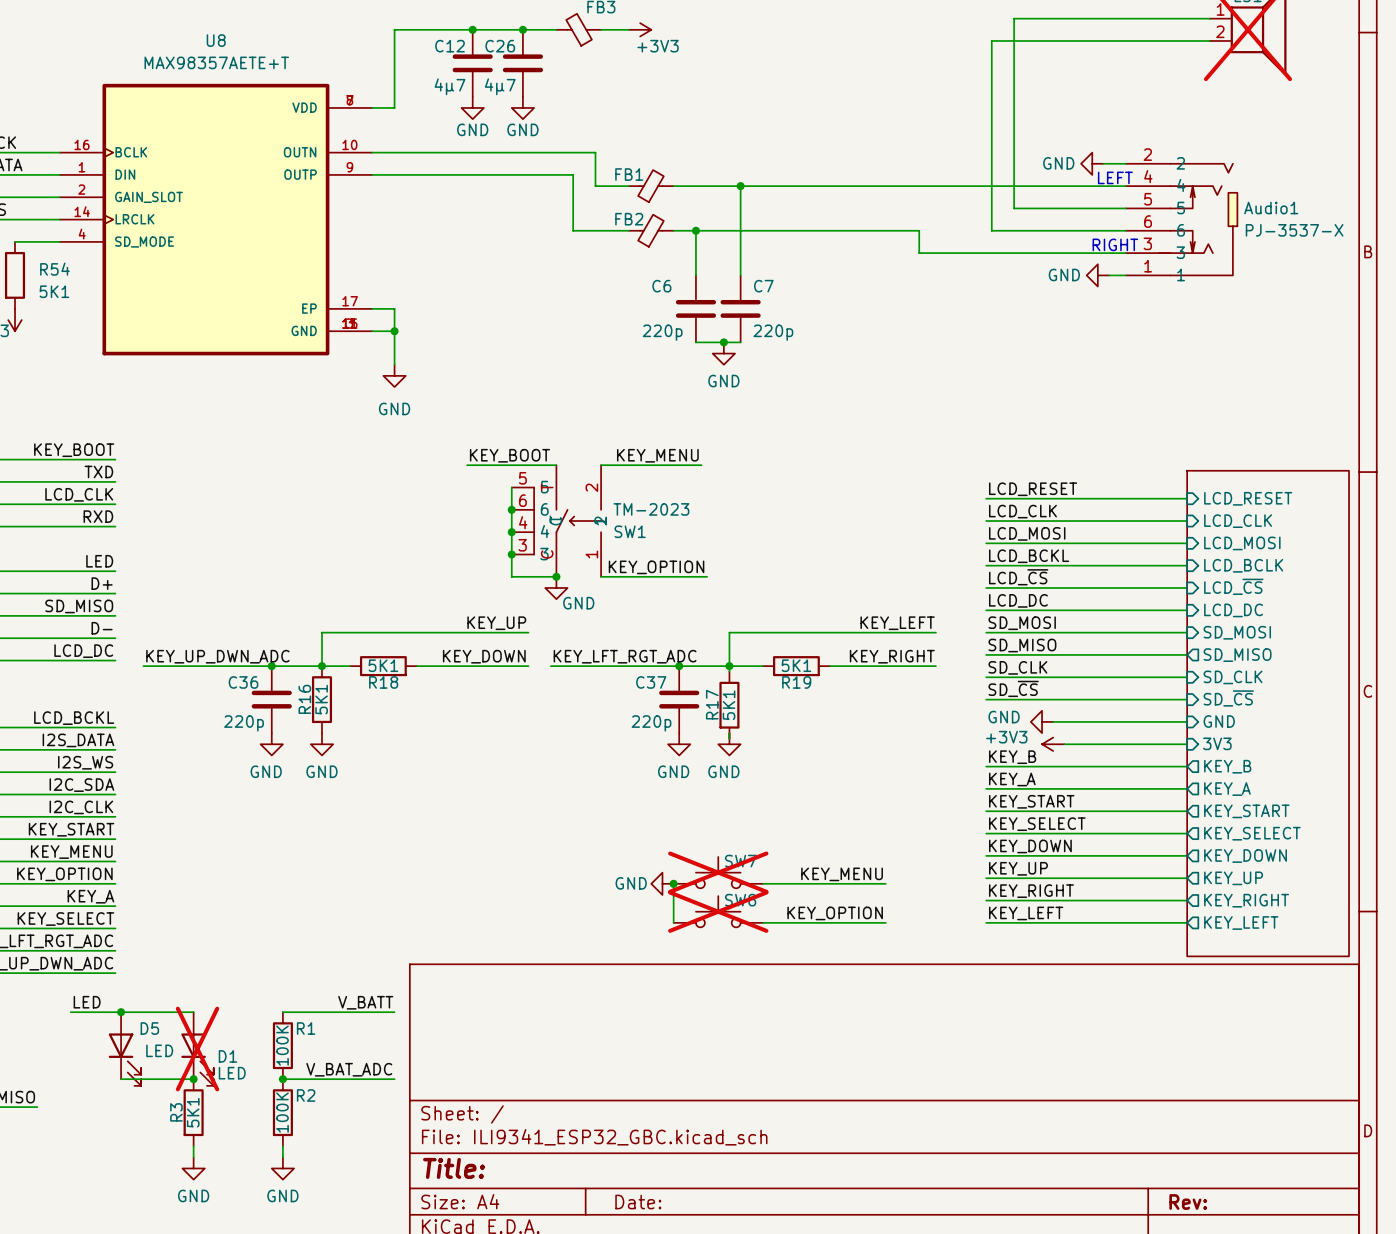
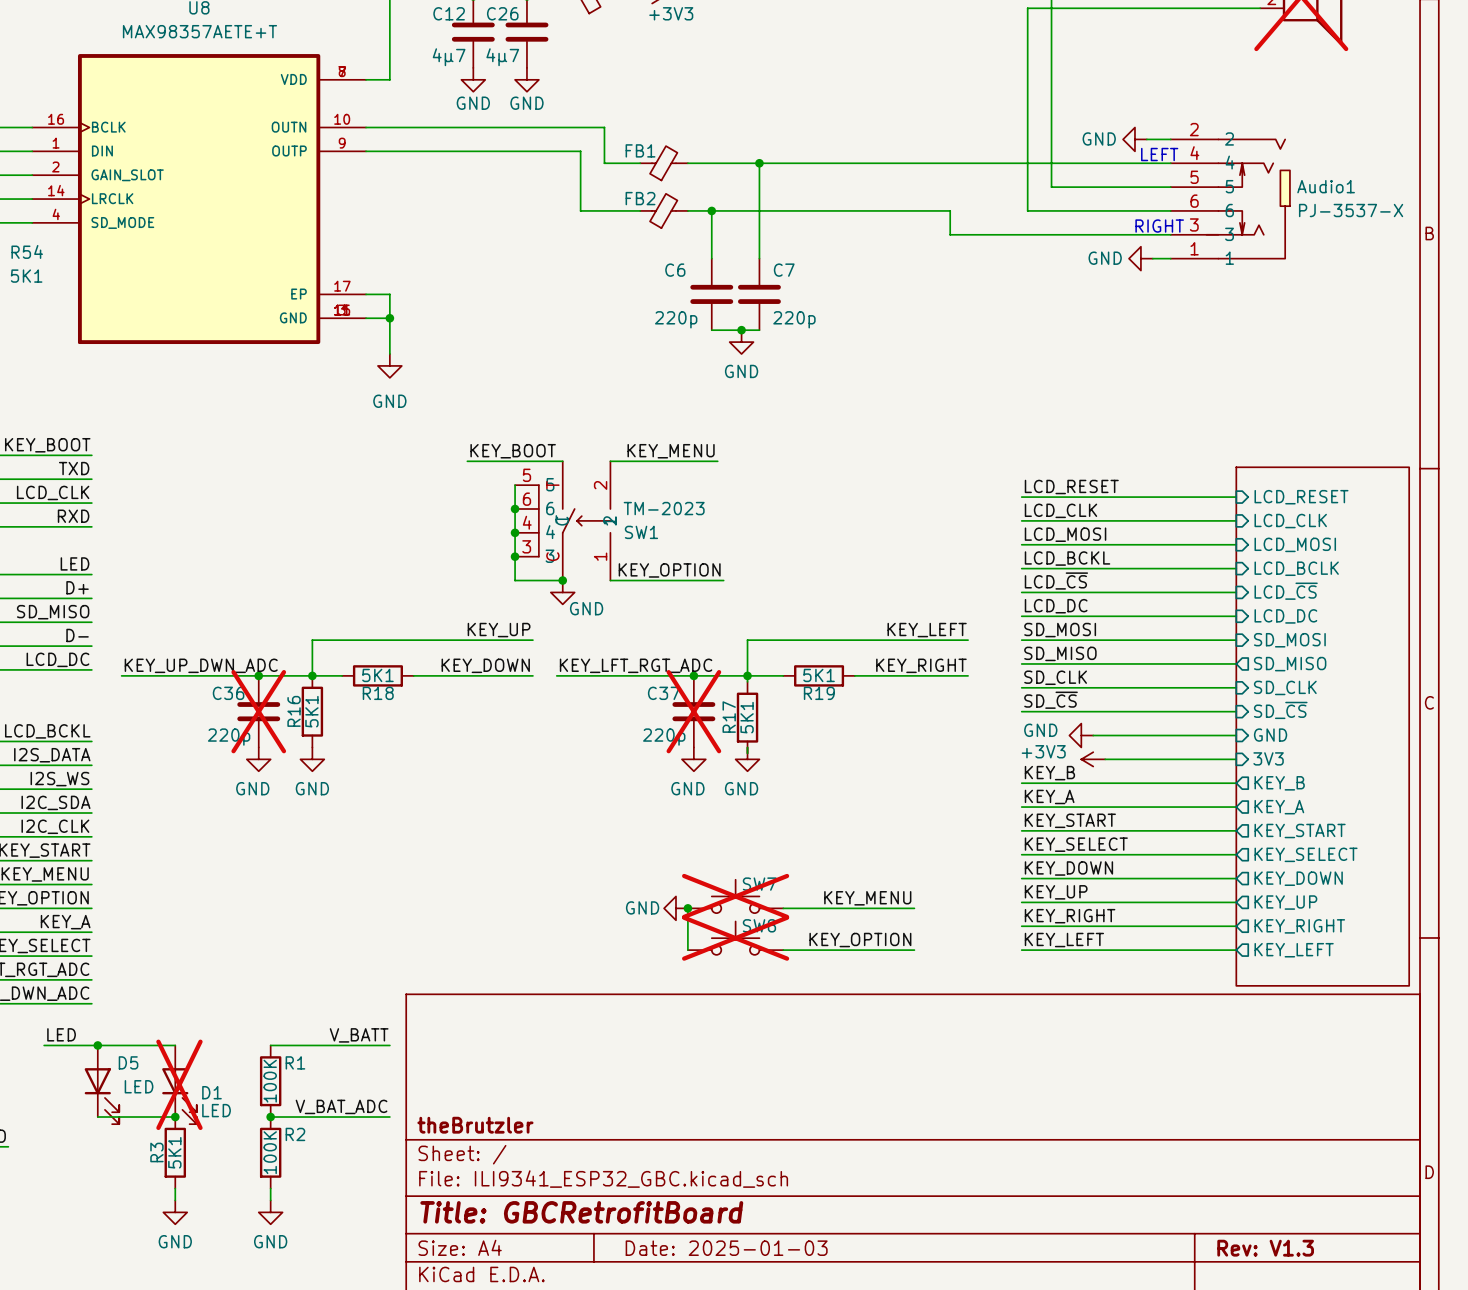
C36 do-not-place cross: none -> (258, 711)
C37 do-not-place cross: none -> (693, 711)
title block: none -> theBrutzler (475, 1125)
title block: Title: (454, 1168) -> Title: GBCRetrofitBoard (581, 1212)
title block: Date: (638, 1202) -> Date: 2025-01-03 (726, 1248)
title block: Rev: (1188, 1202) -> Rev: V1.3 (1265, 1248)

